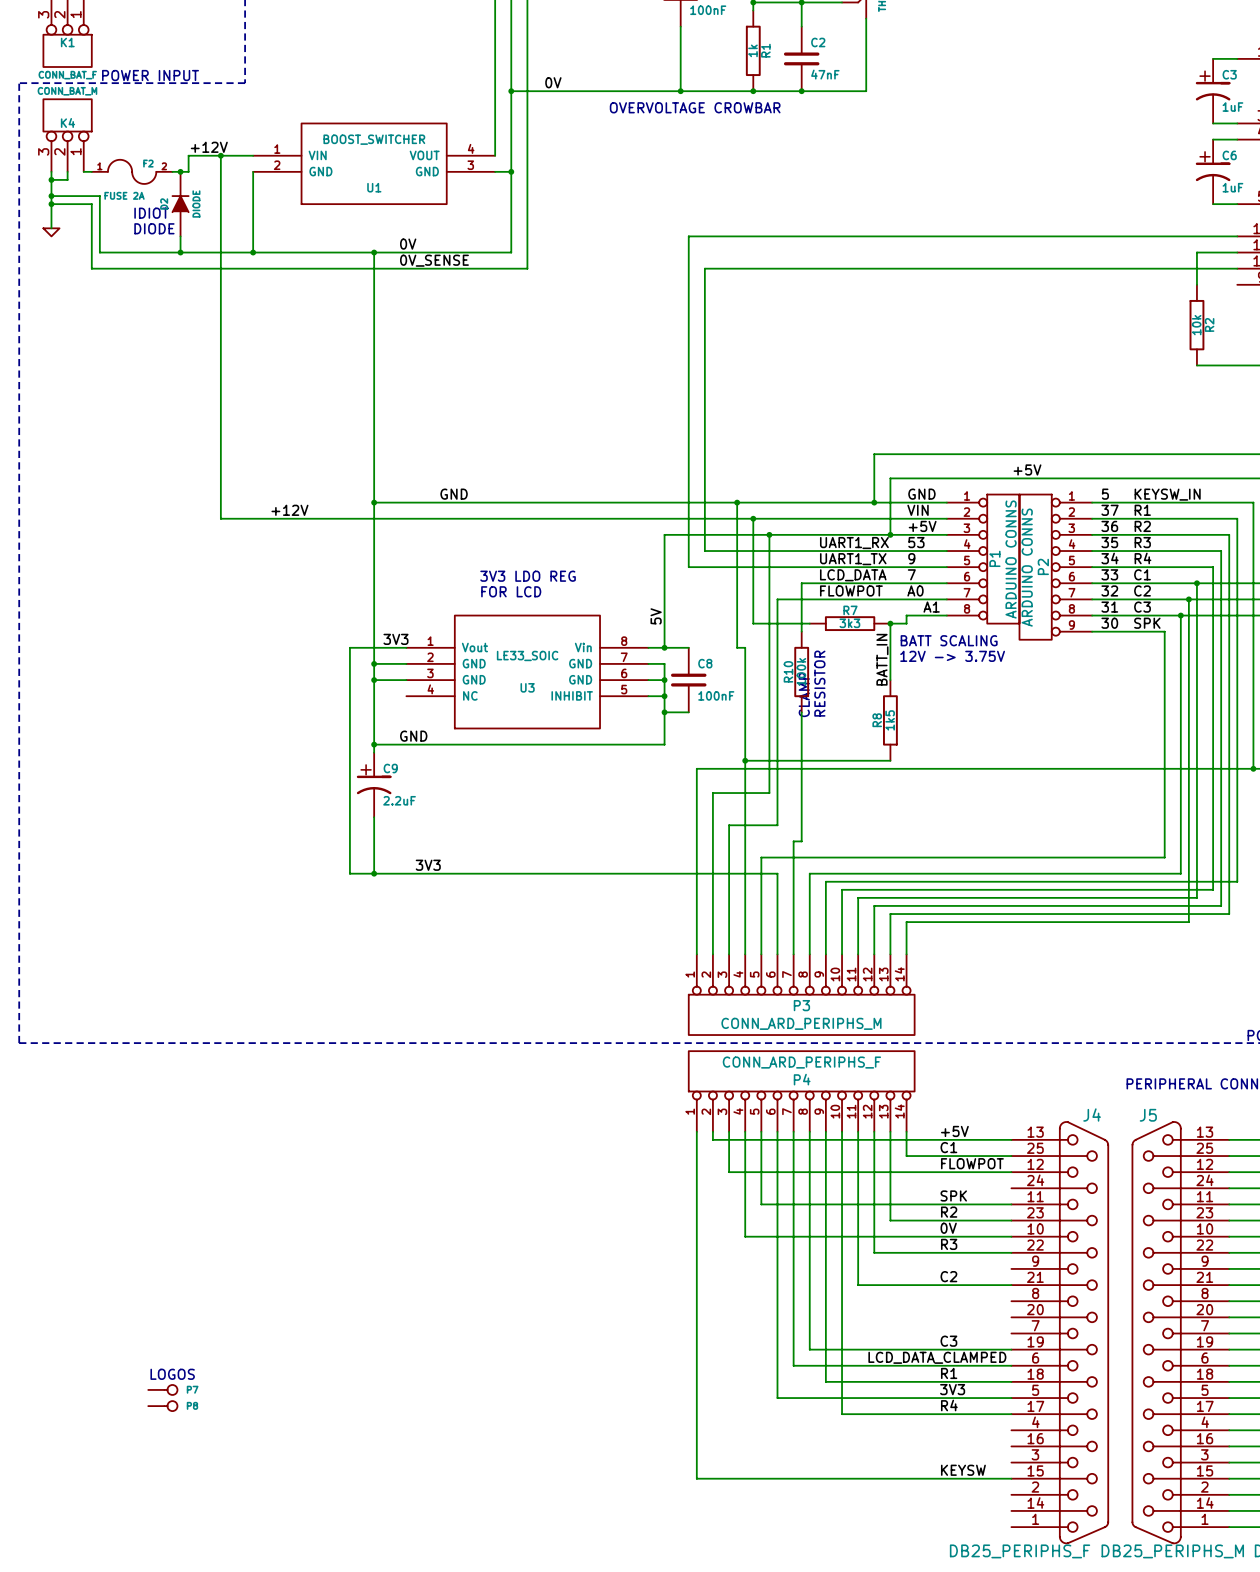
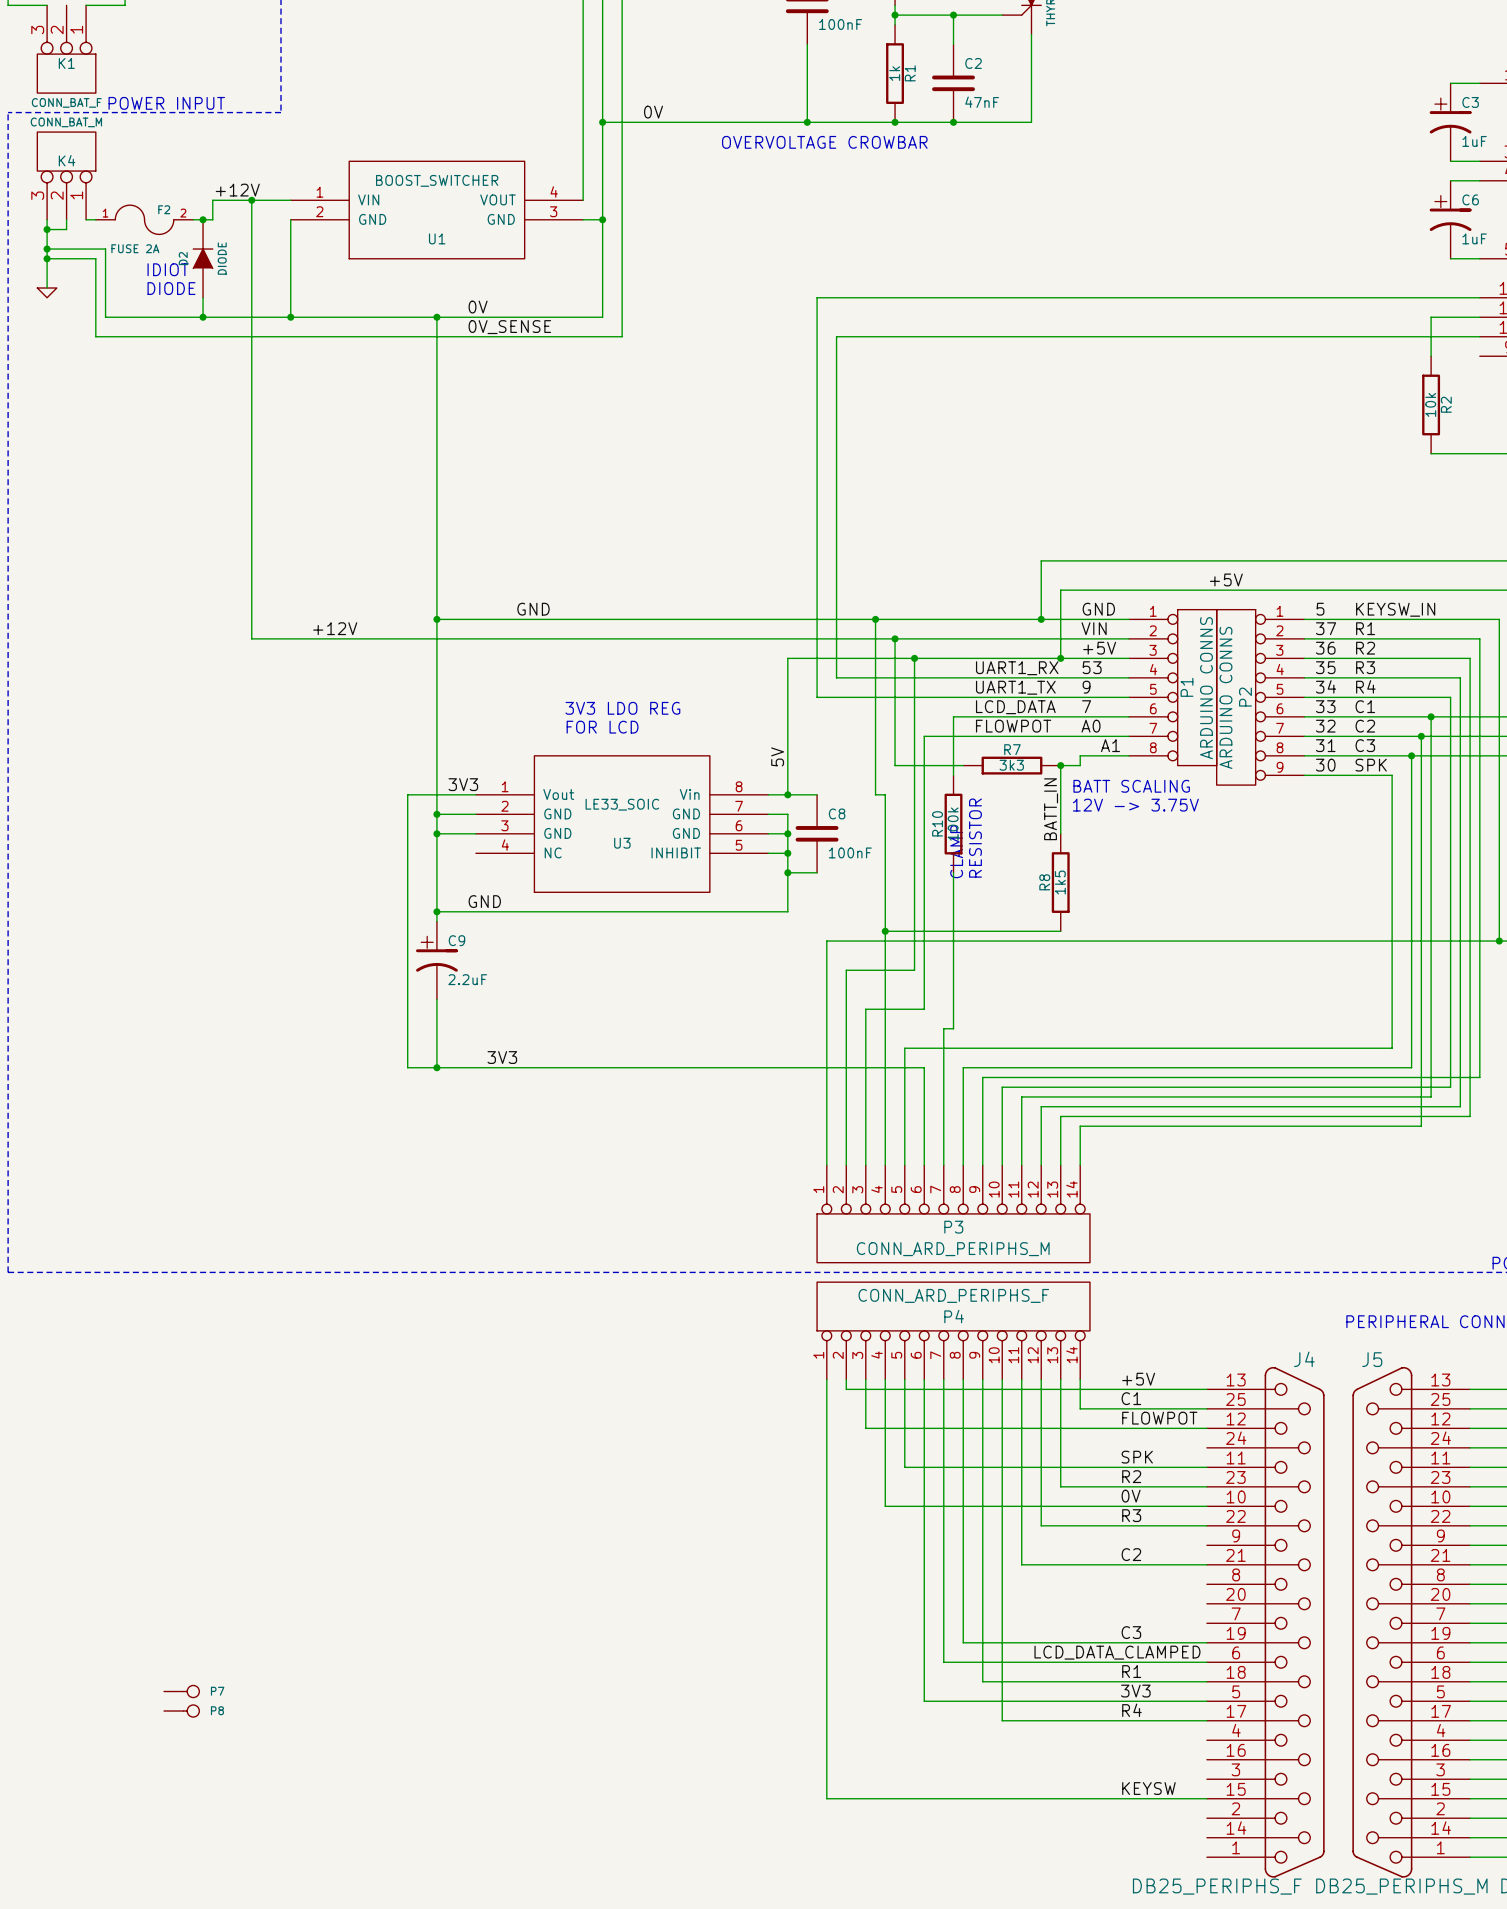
text: LOGOS (172, 1374) -> none

